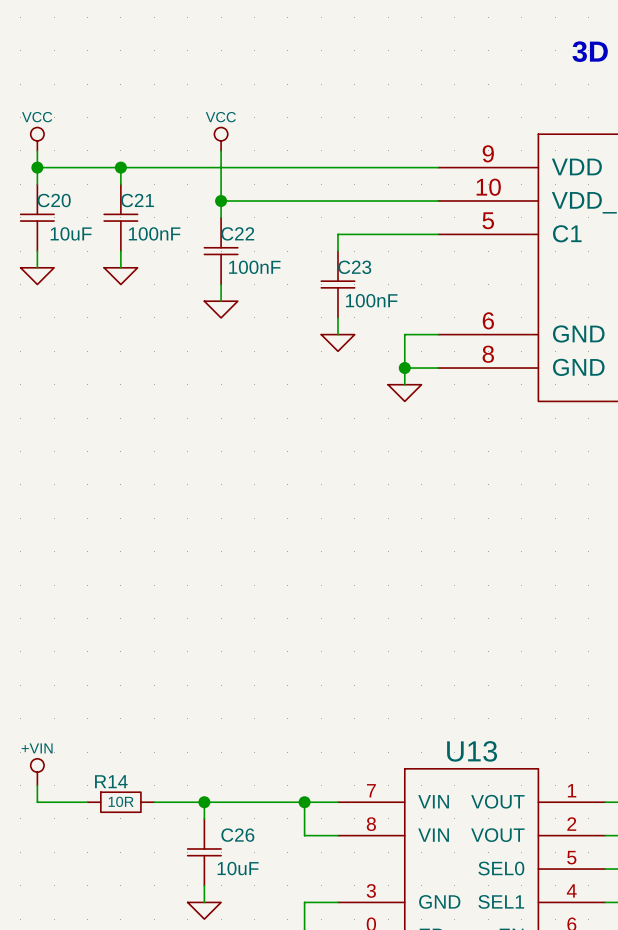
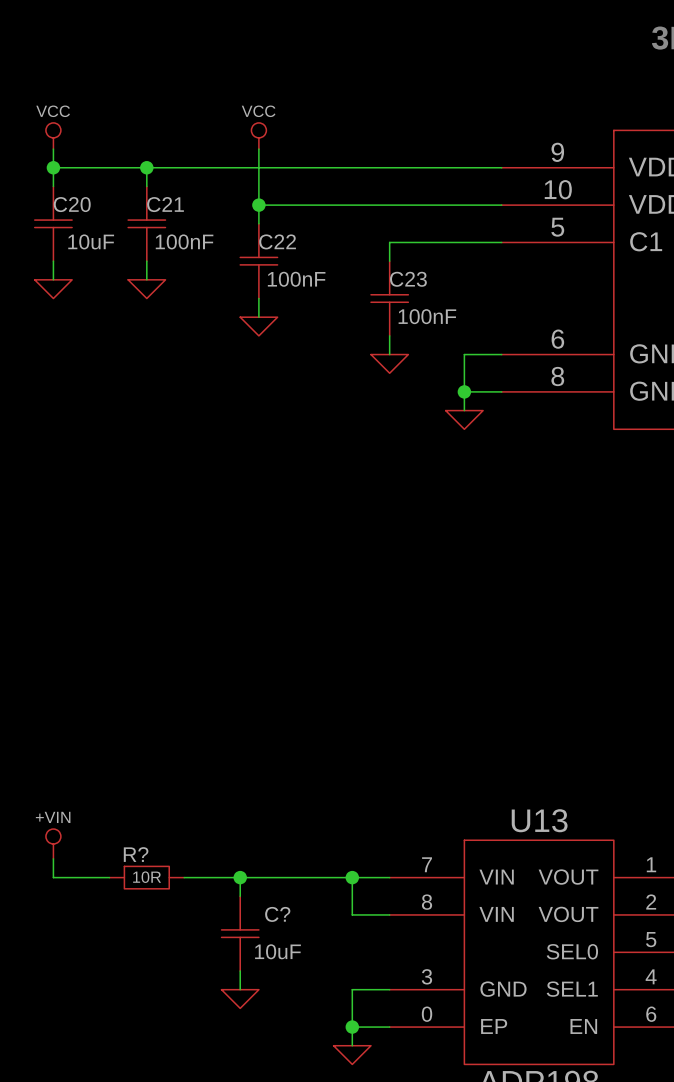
R14 name: R14 (111, 781) -> R? (136, 854)
C26 name: C26 (237, 835) -> C? (277, 914)

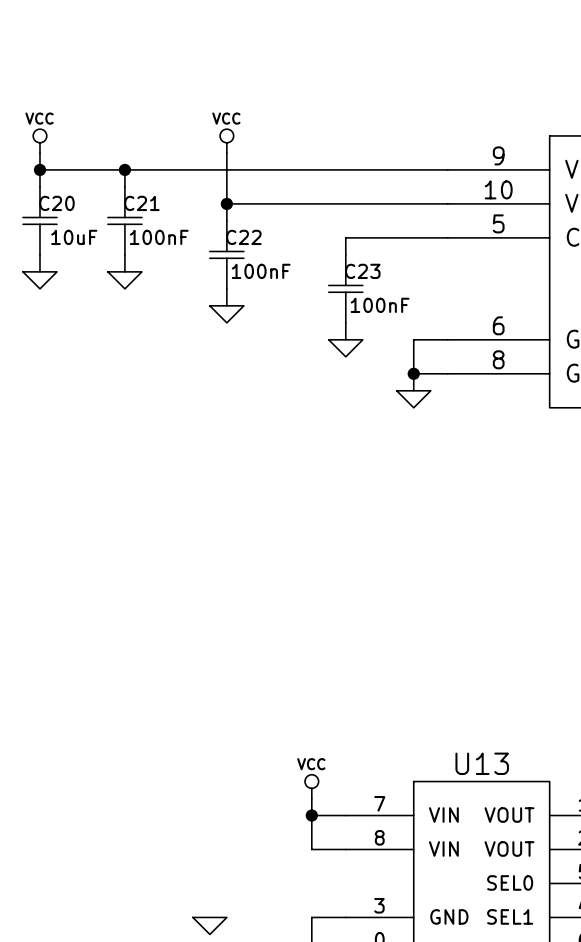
power symbol: +VIN (53, 843) -> none
power symbol: none -> VCC (311, 786)
wire: (53, 858) (53, 877) (109, 877) -> none
R?: 10R (146, 877) -> none
wire: (184, 877) (352, 877) -> (311, 798) (311, 815)
wire: (240, 877) (240, 896) -> none
junction: (240, 877) -> none
C?: 10uF (240, 933) -> none
wire: (240, 971) (240, 989) -> none

